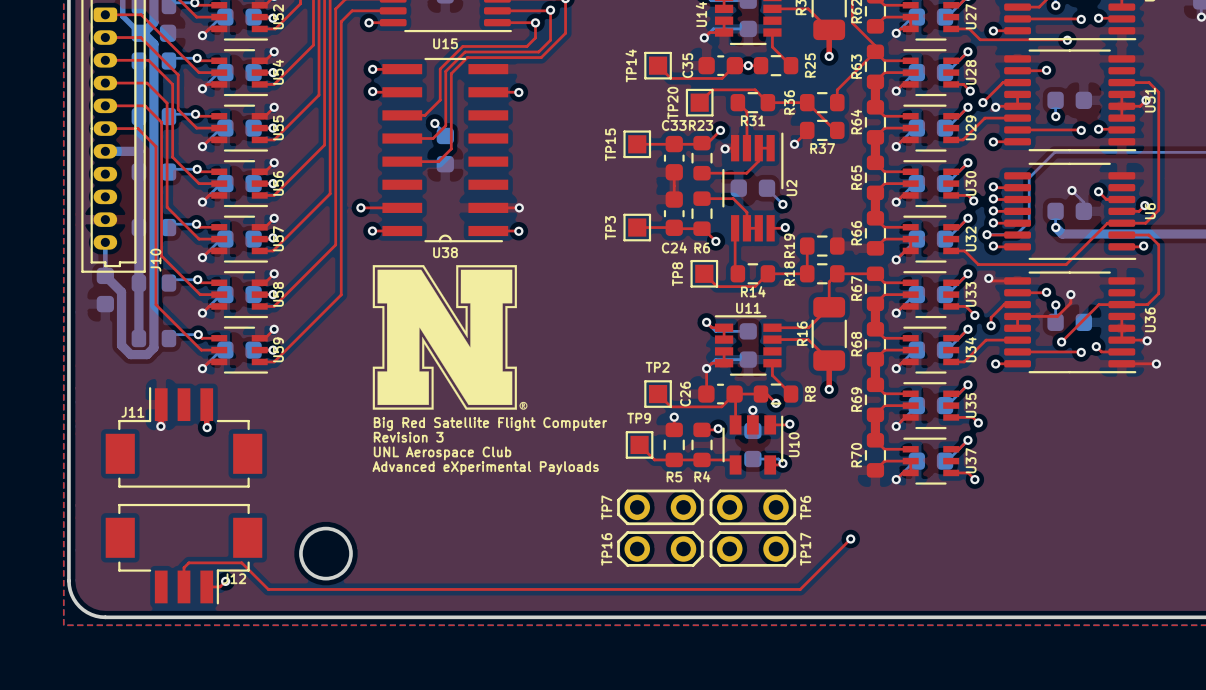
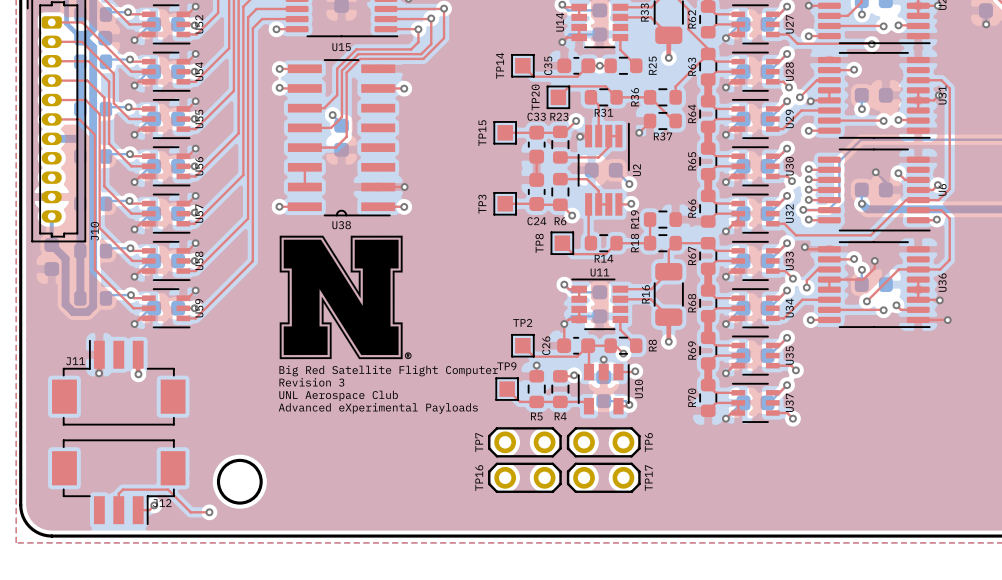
top track: (360, 207) (402, 207) -> (304, 167) (304, 187)
via: (360, 207) -> none
top track: (850, 539) (800, 589) (290, 589) -> none
via: (850, 539) -> none
via: none -> (209, 512)

